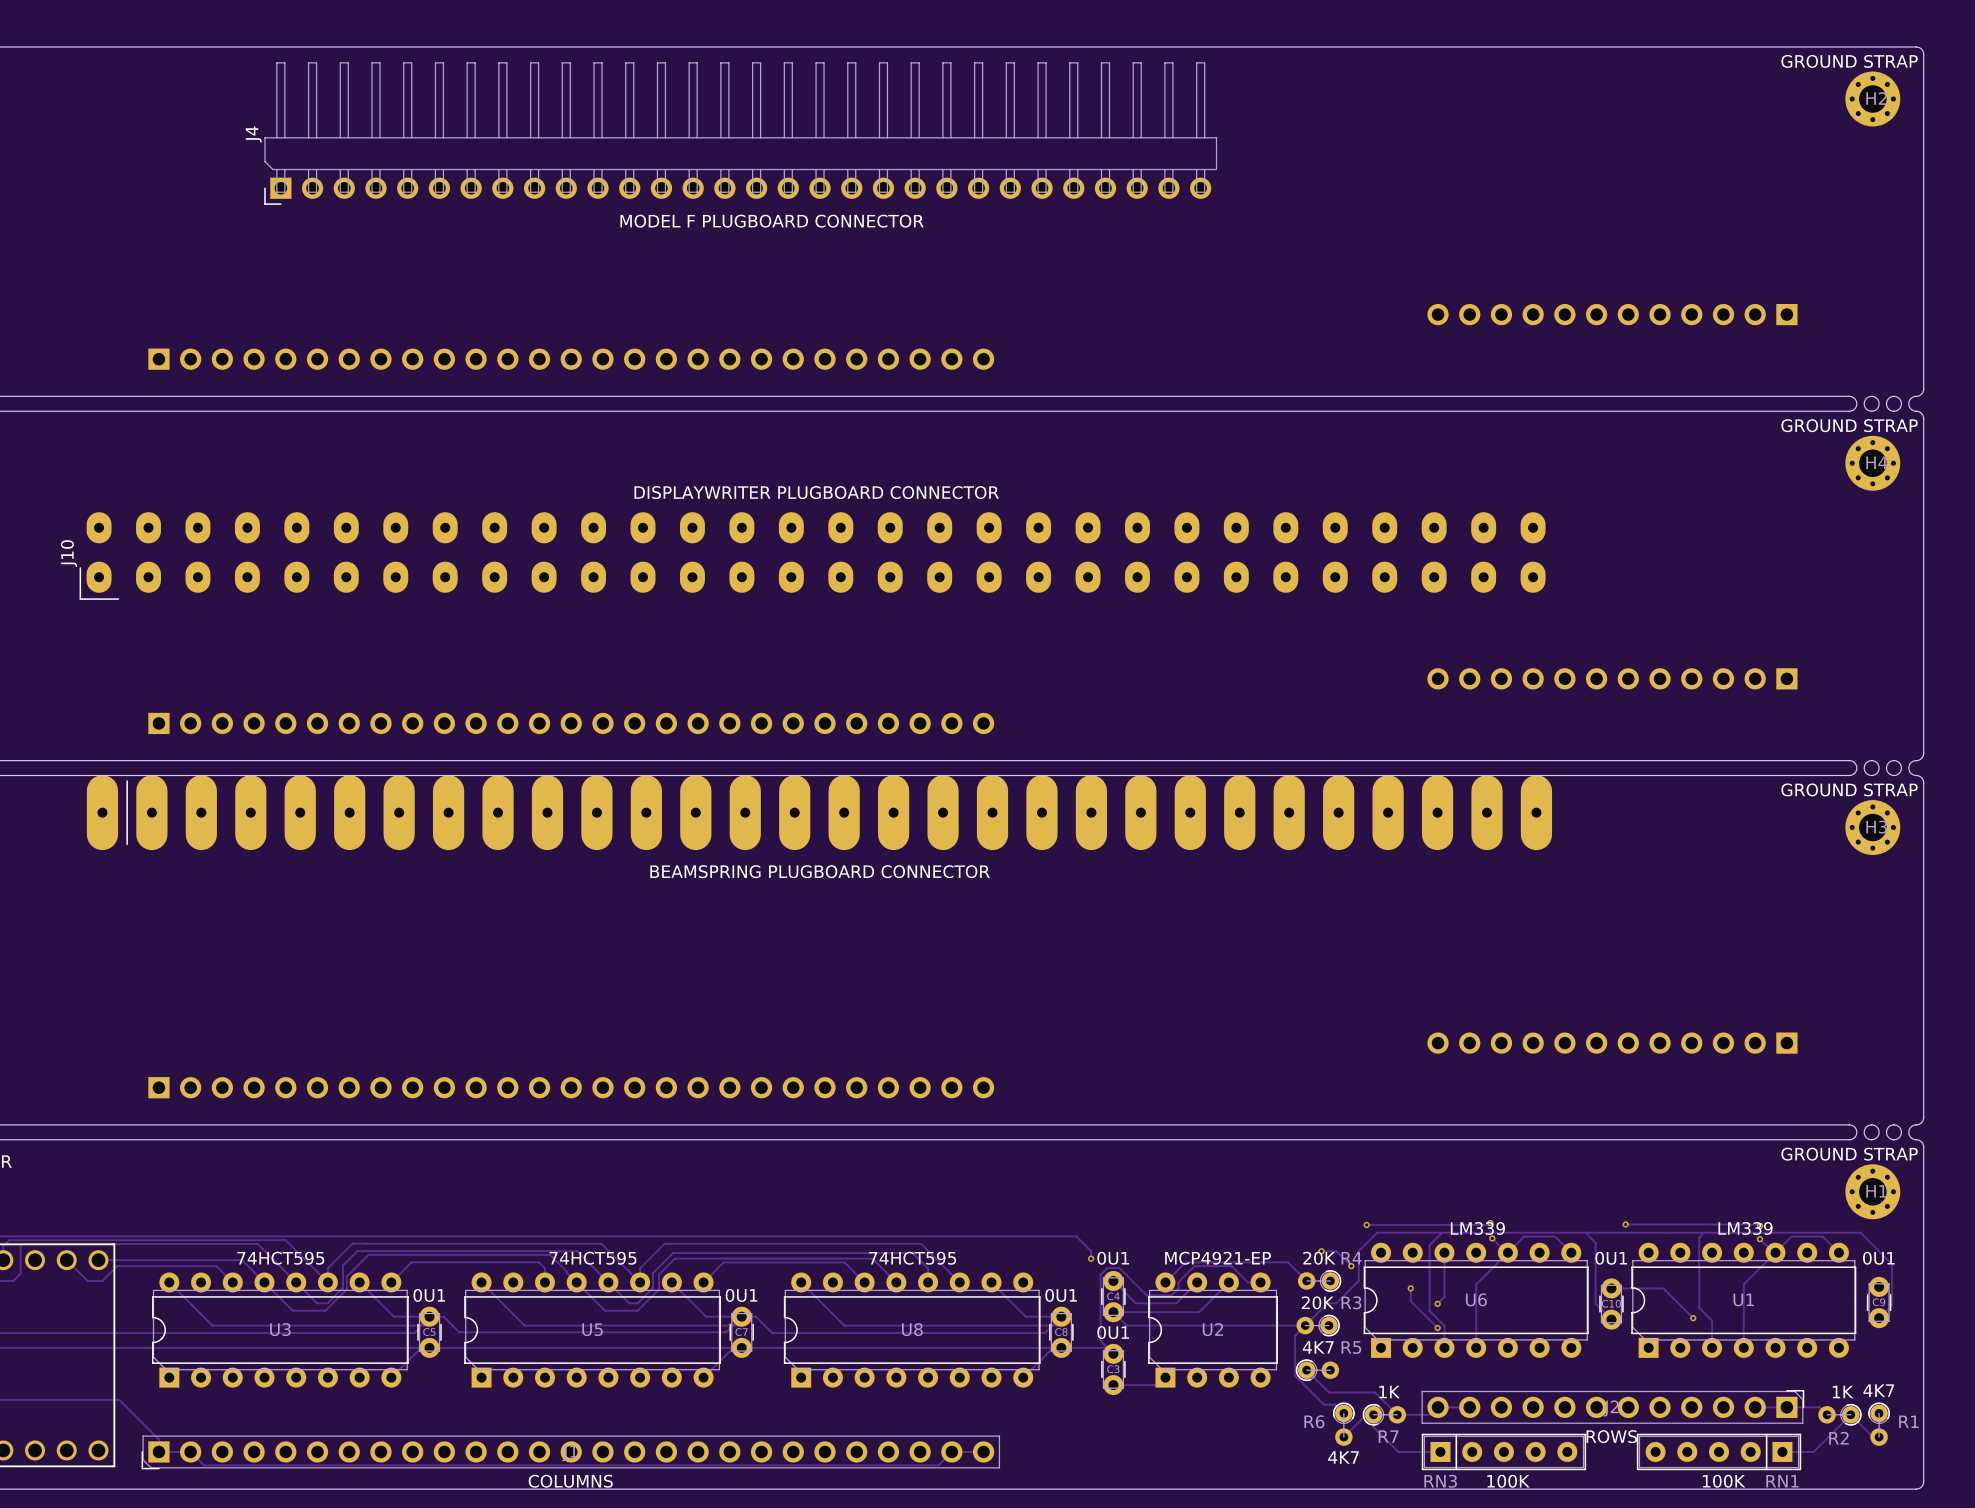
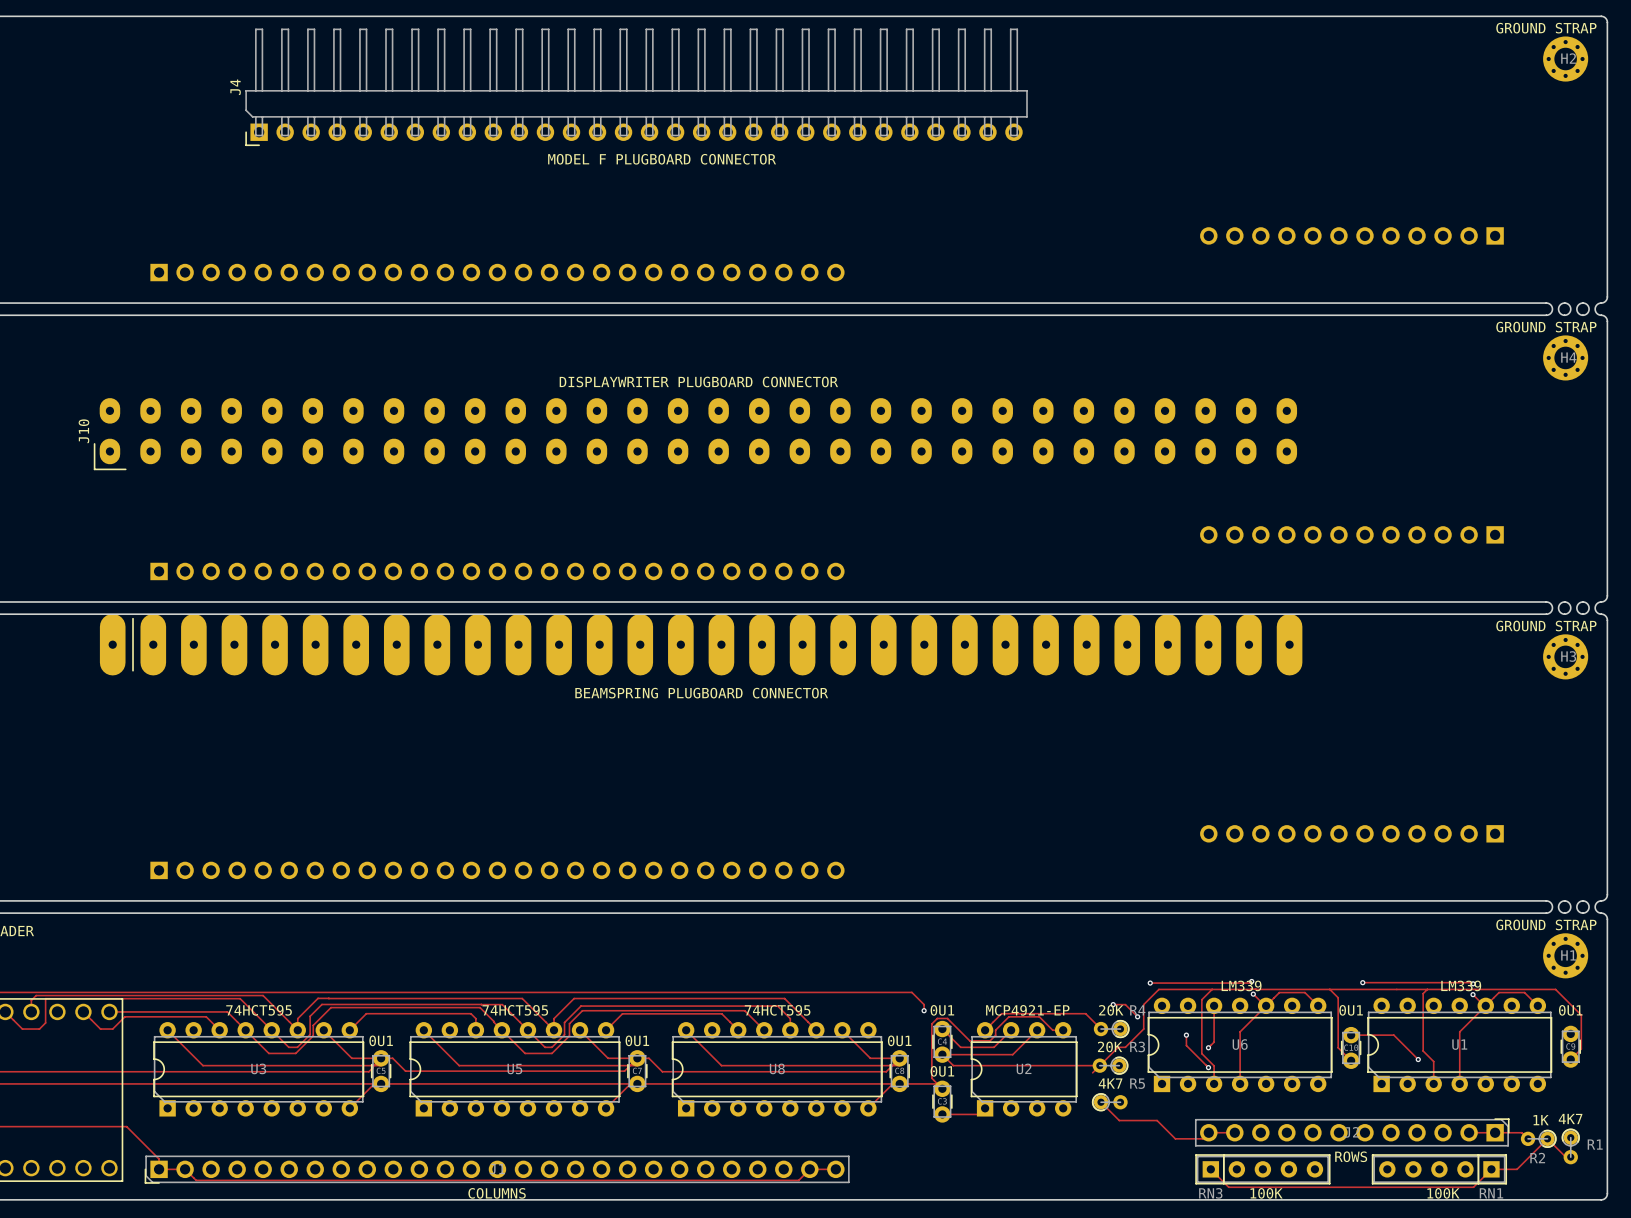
track: (1296, 1334) (1295, 1375) (1323, 1404) (1335, 1404) (1343, 1413) -> none
R7: 1K (1384, 1414) -> none
R6: 4K7 (1343, 1424) -> none
track: (1343, 1437) (1366, 1414) (1373, 1414) (1373, 1427) (1398, 1451) (1440, 1451) -> (1491, 1169) (1473, 1187) (1228, 1187) (1210, 1169)

